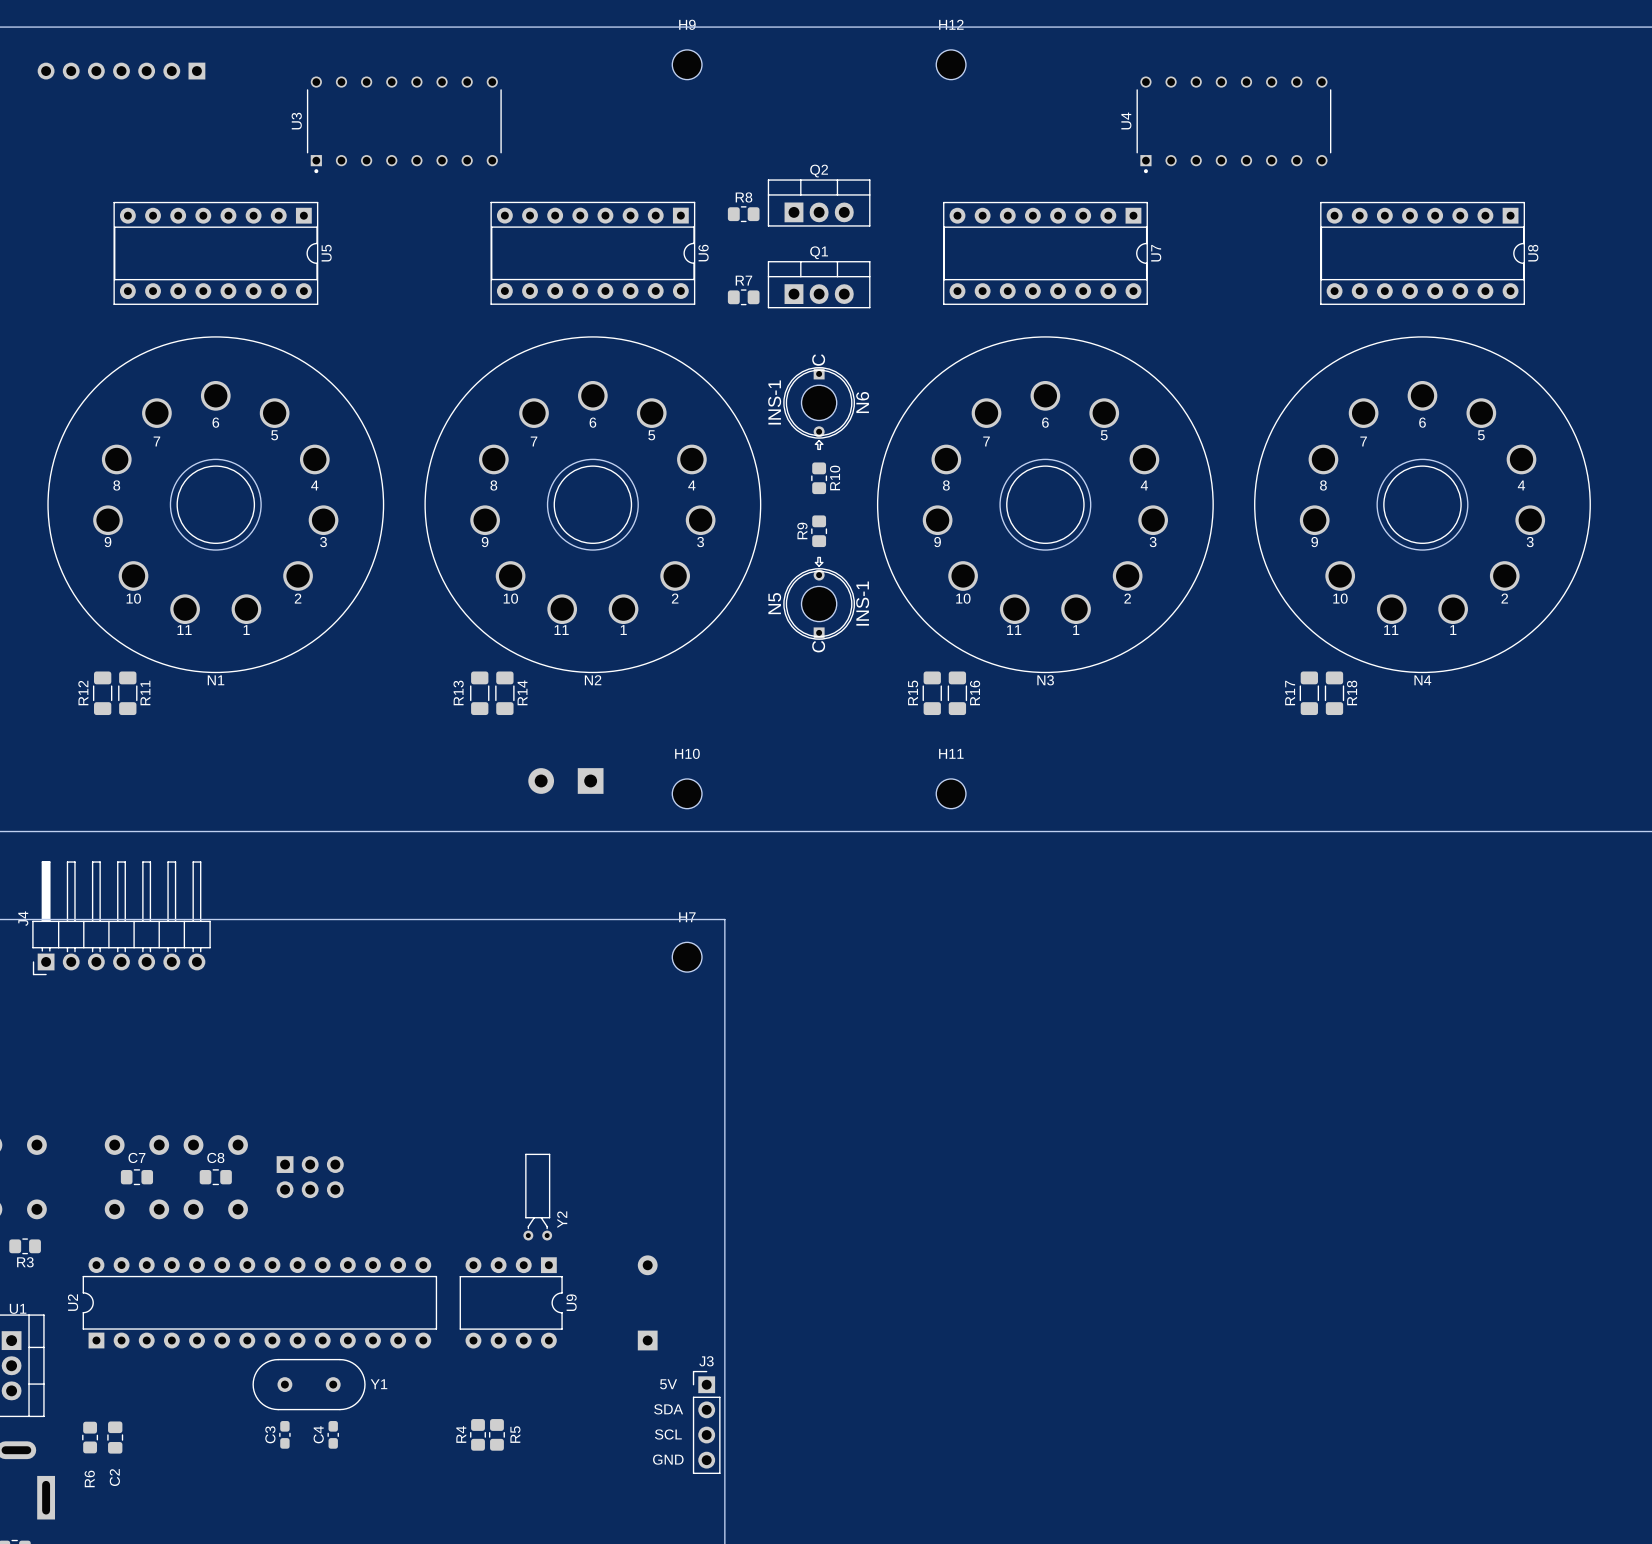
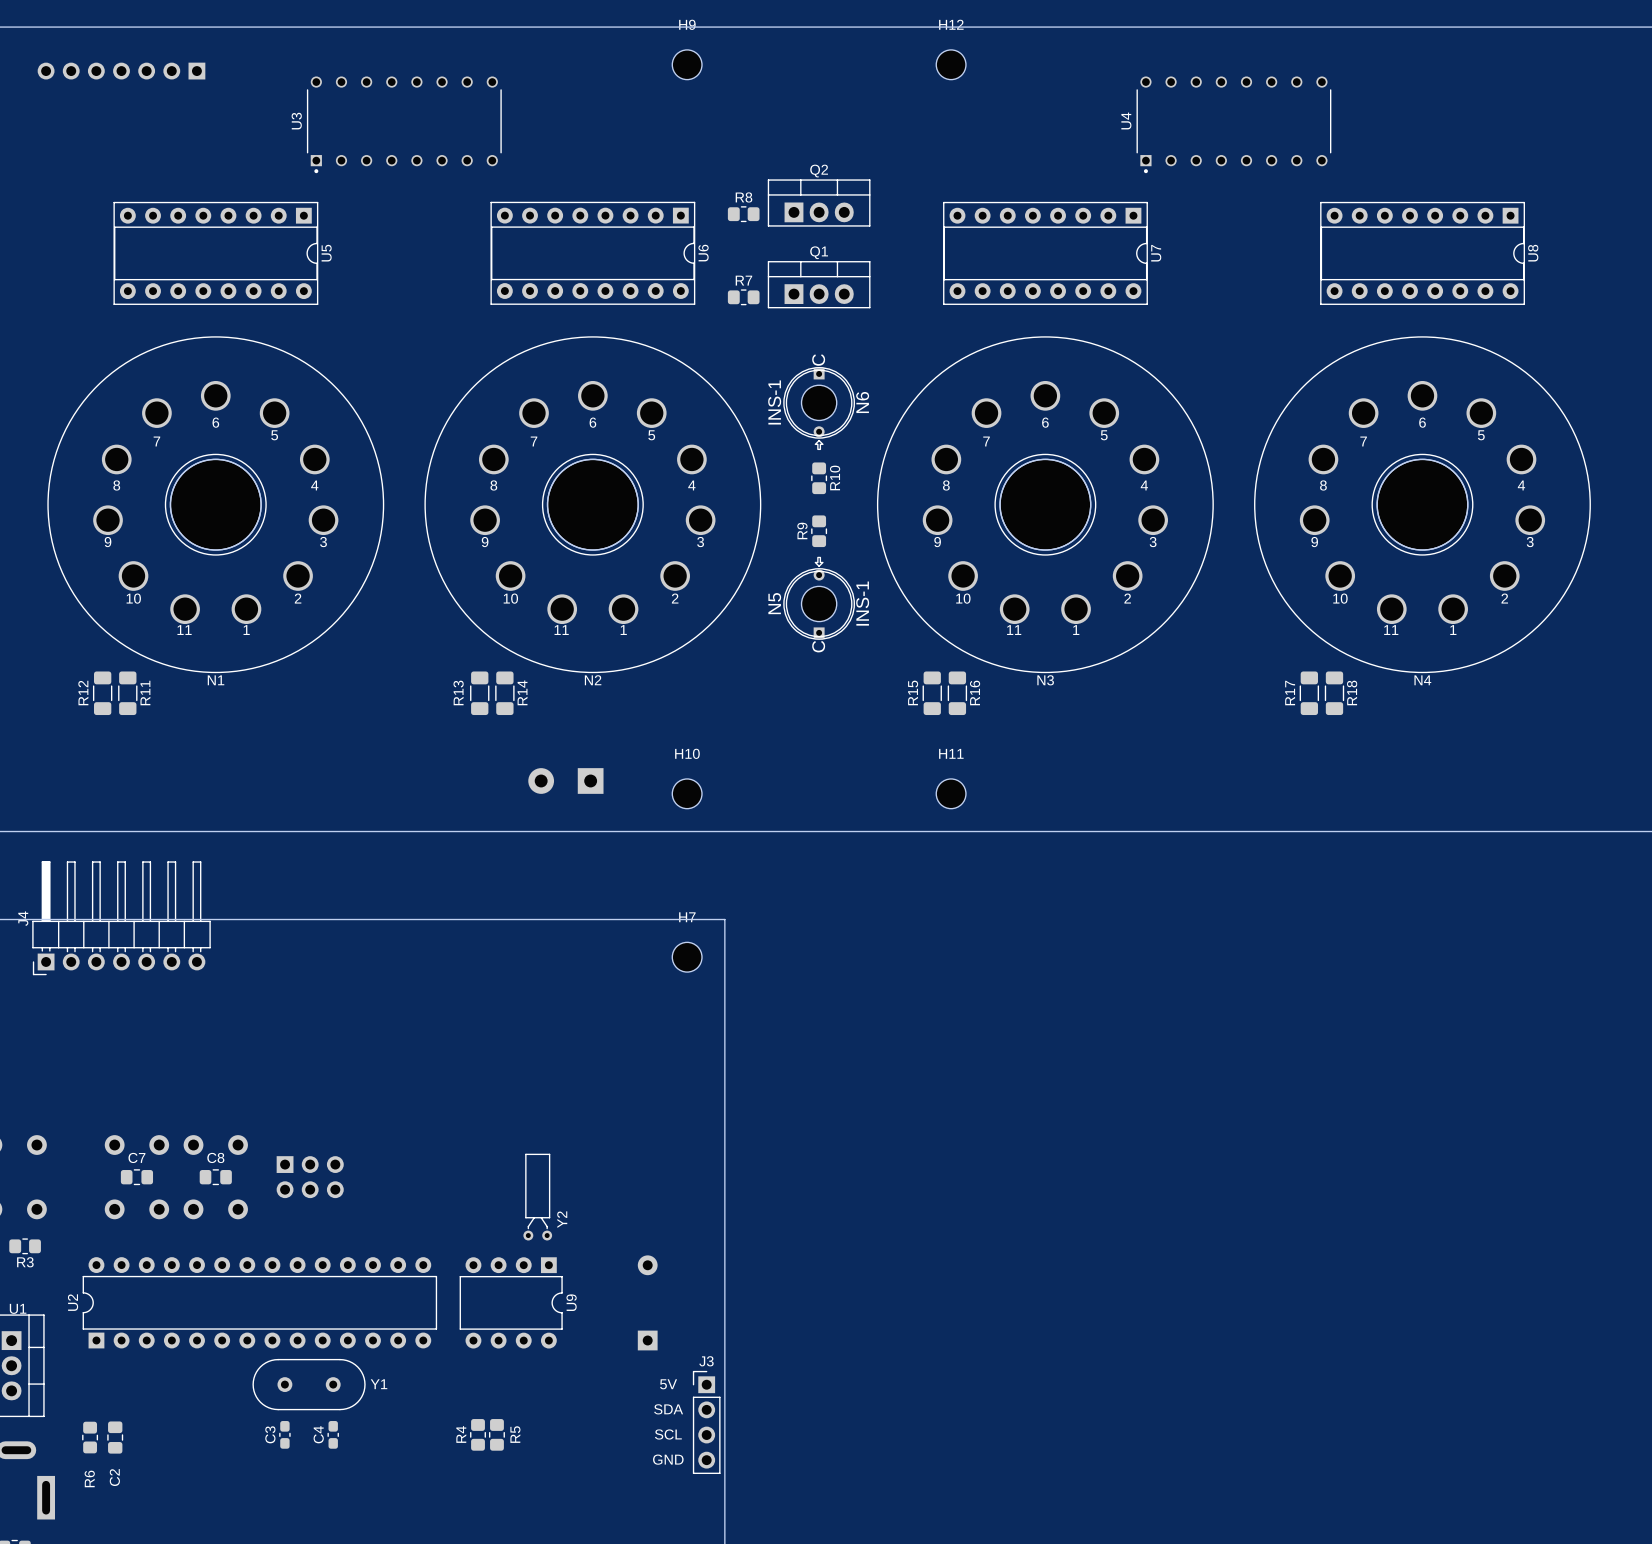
N1 footprint: [47, 336, 385, 674] -> [47, 336, 385, 674]
N2 footprint: [424, 336, 762, 674] -> [424, 336, 762, 674]
N3 footprint: [877, 336, 1214, 674] -> [877, 336, 1214, 674]
N4 footprint: [1254, 336, 1591, 674] -> [1254, 336, 1591, 674]

